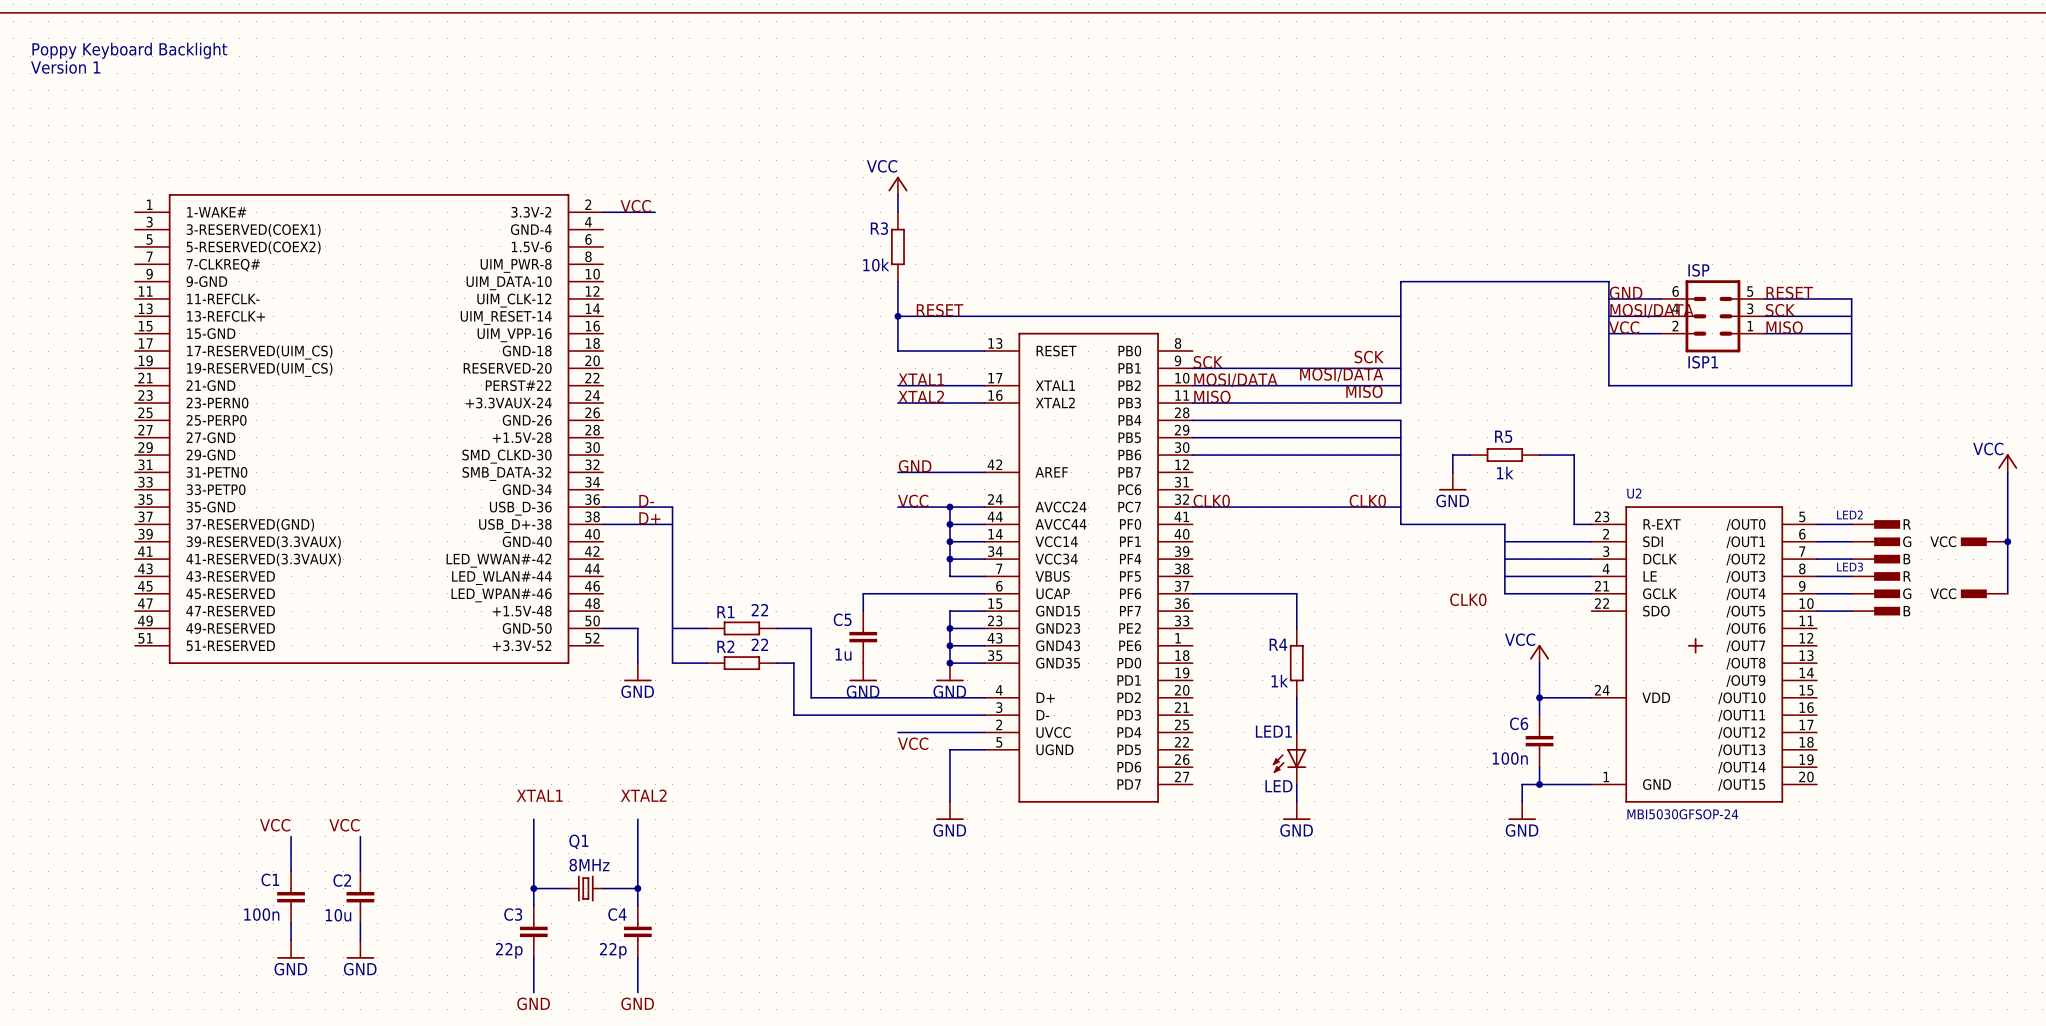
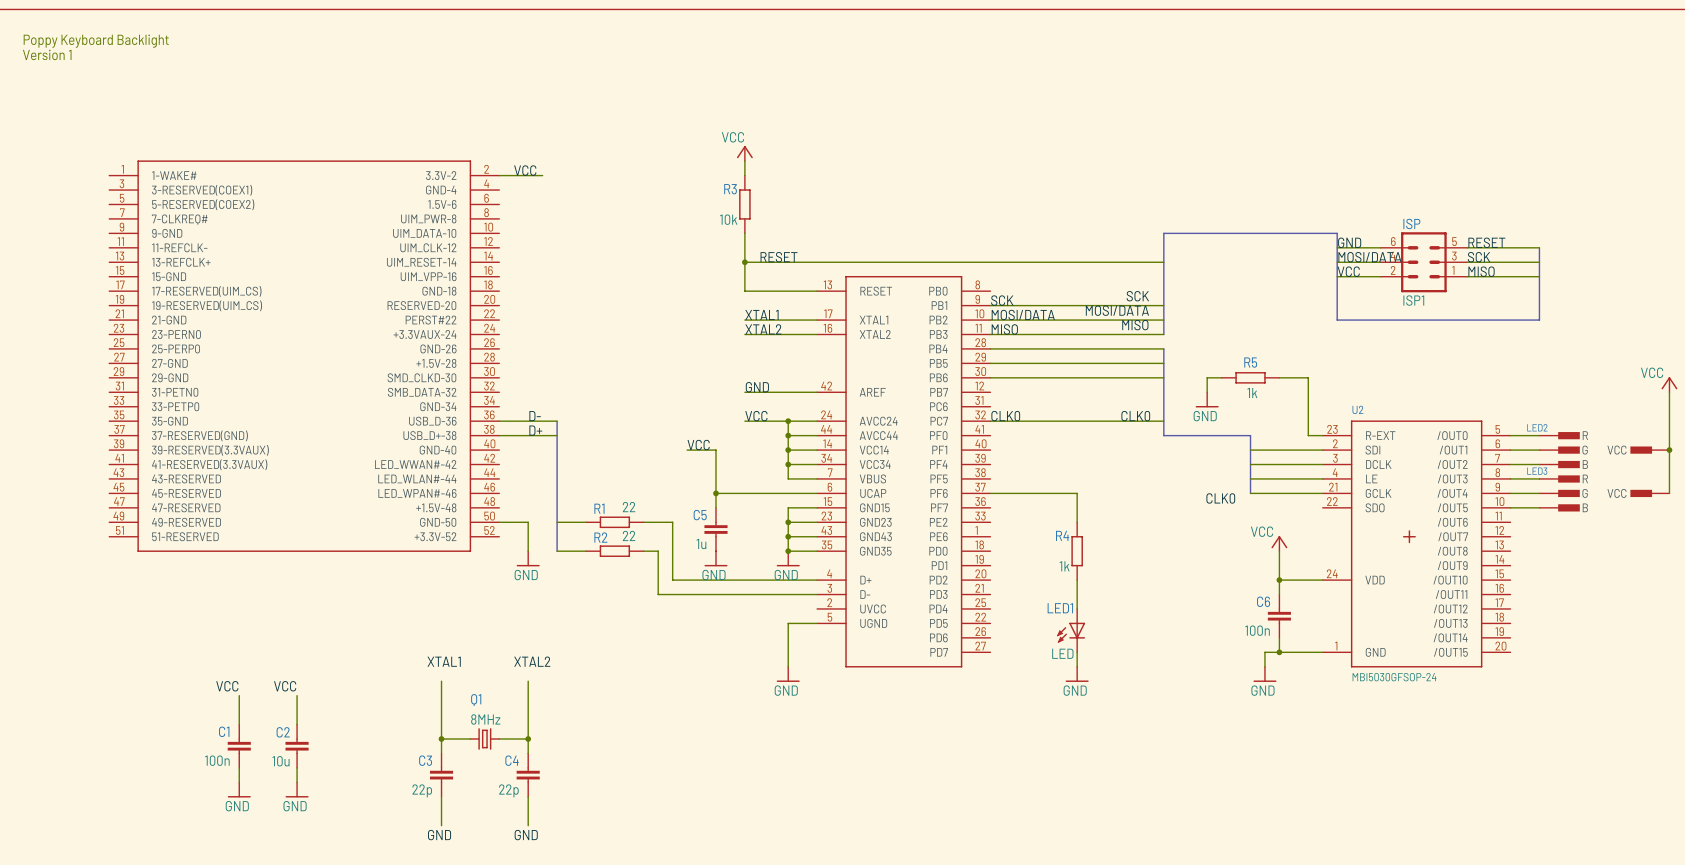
label: none -> VCC (698, 445)
wire: none -> (687, 450) (716, 450) (716, 493)
junction: none -> (716, 493)
wire: (897, 732) (984, 732) -> none
label: VCC (913, 743) -> none

